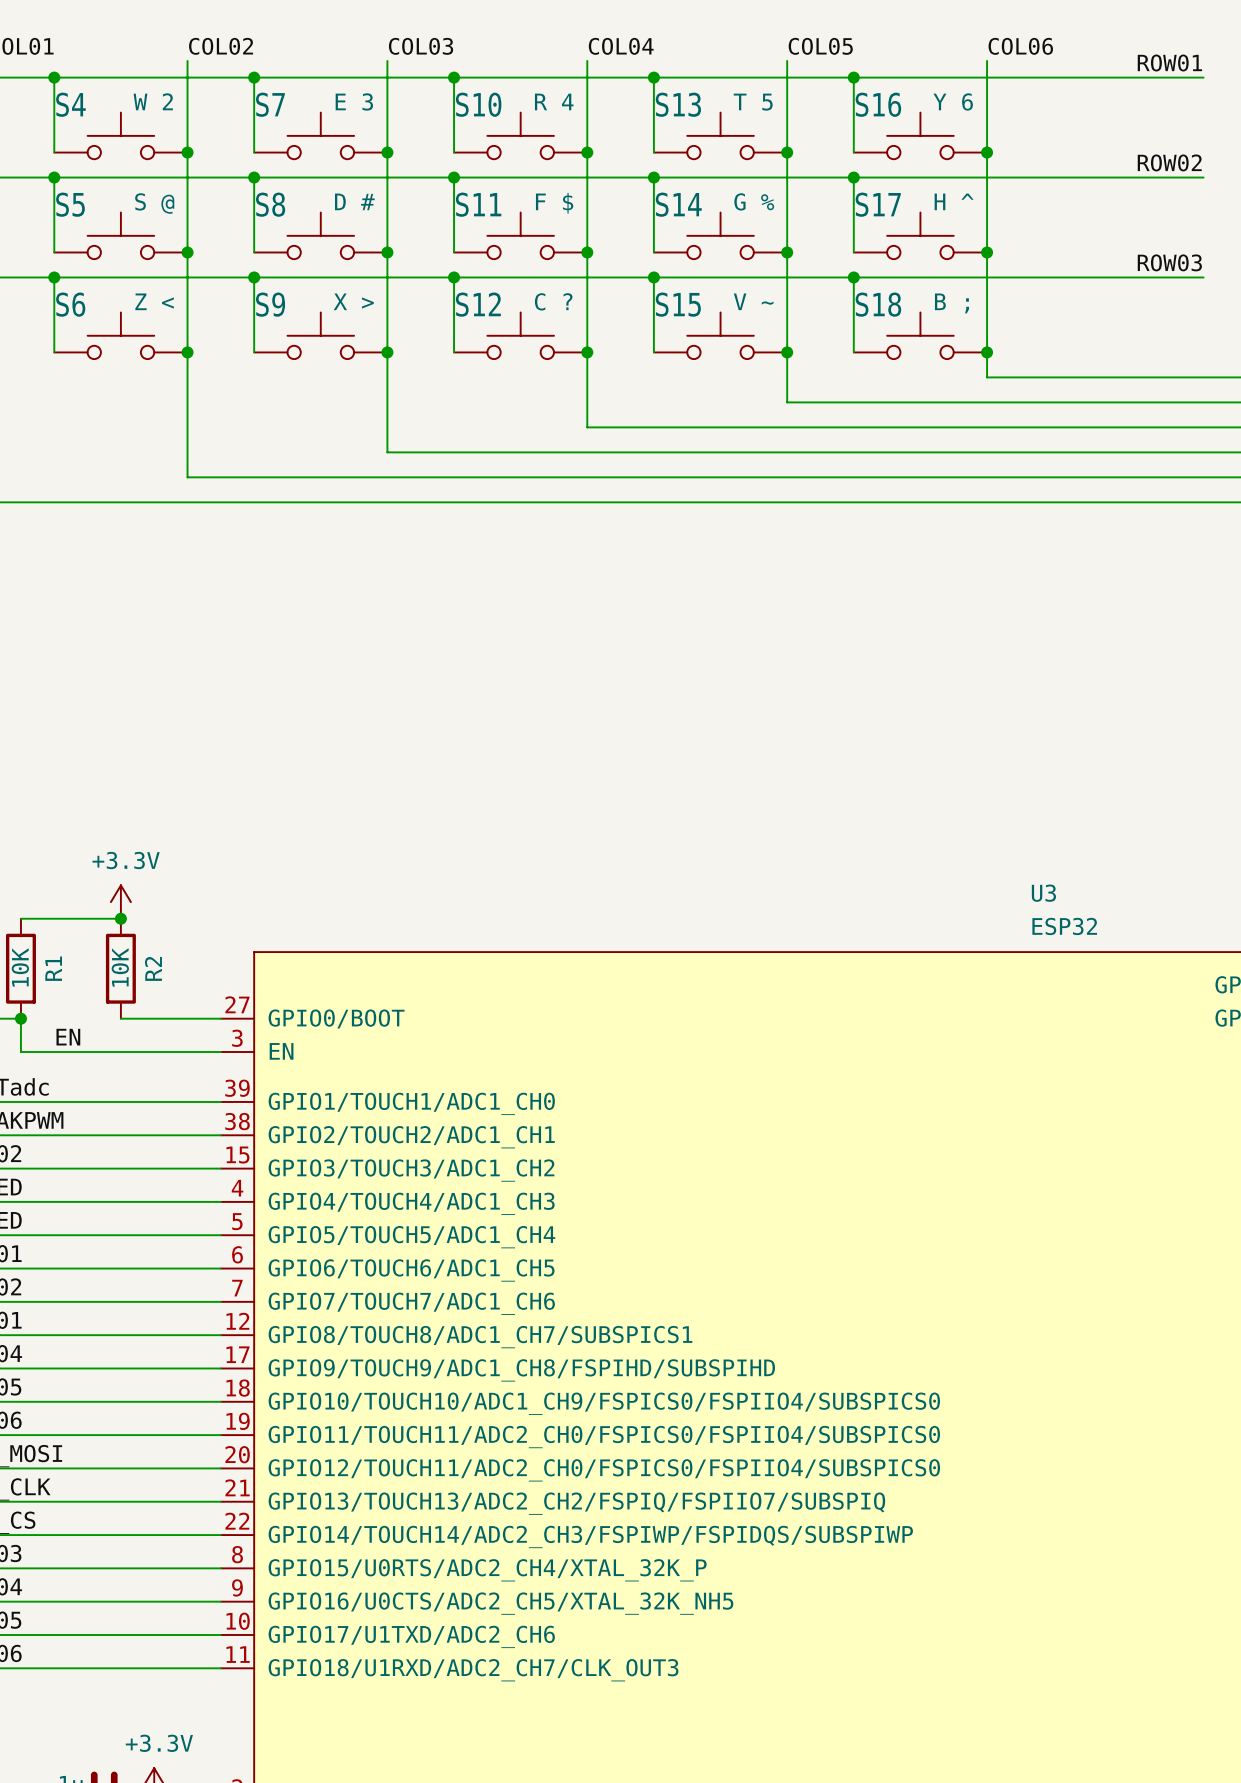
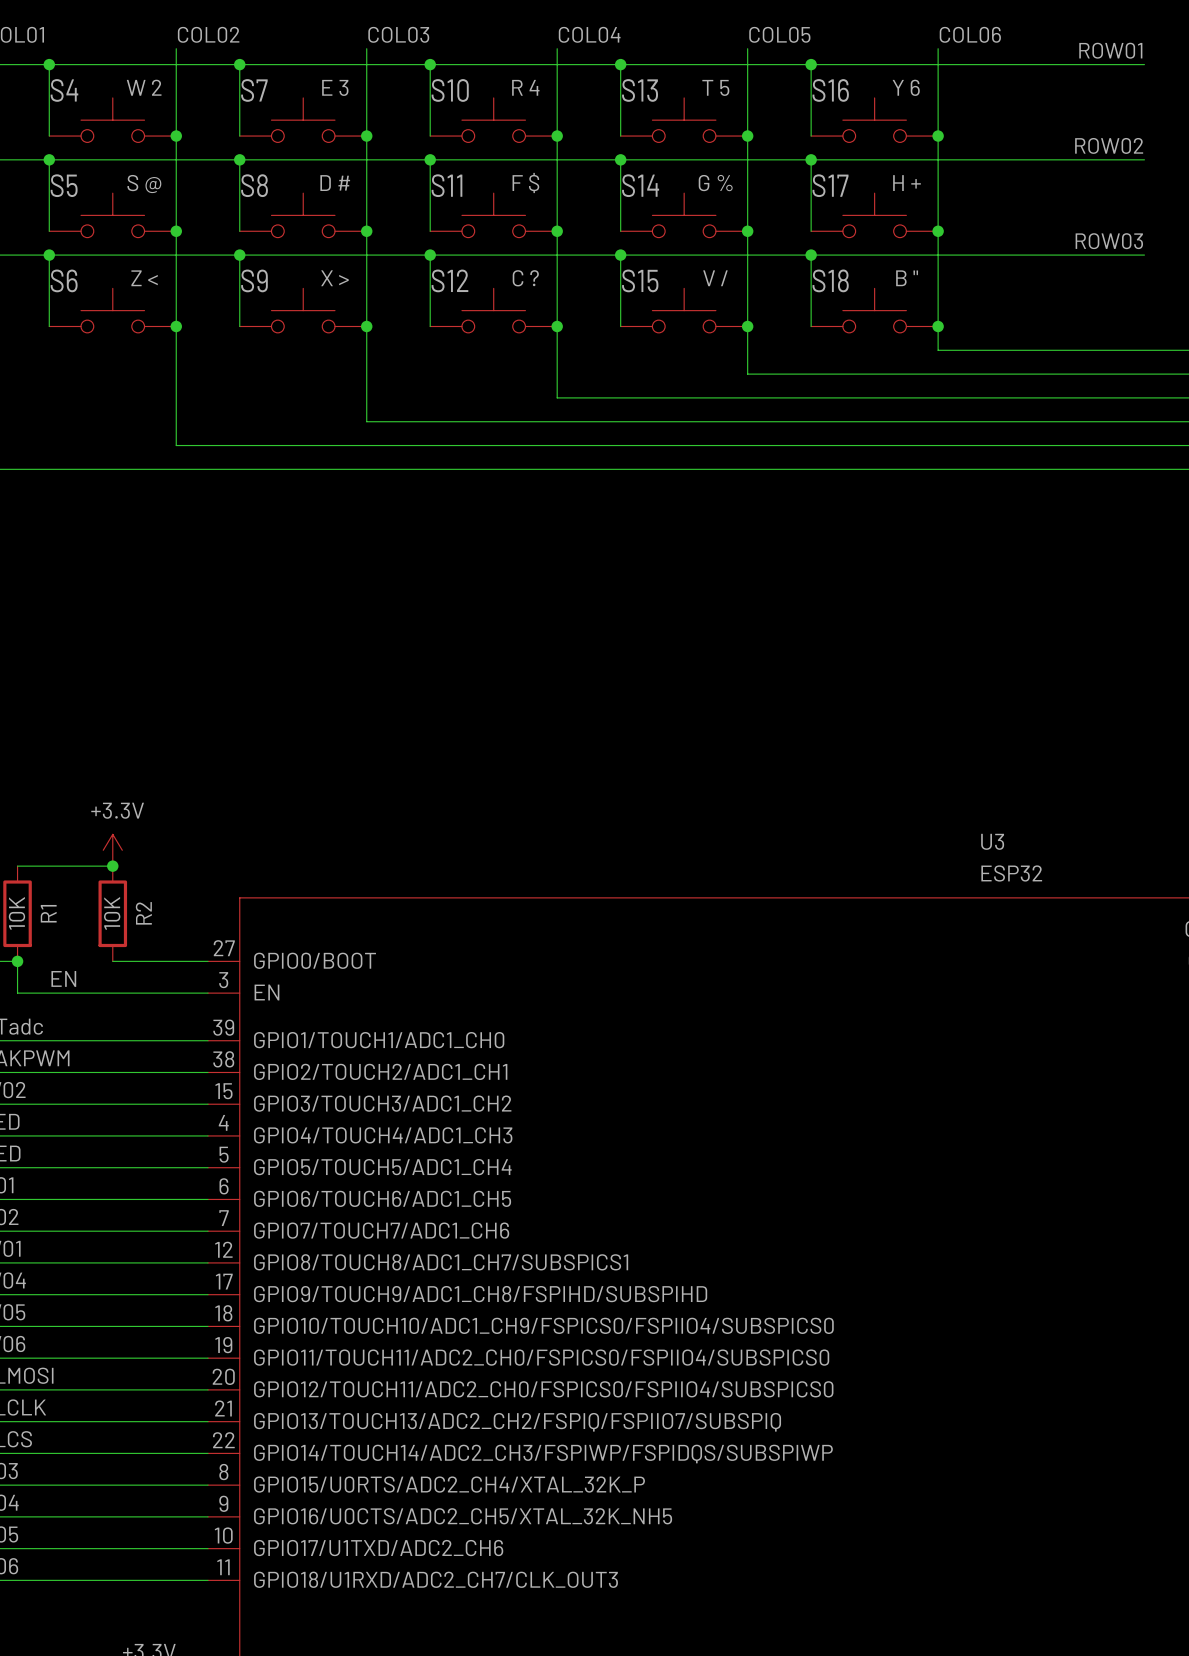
S17 text: H ^ (954, 201) -> H + (906, 183)
S15 text: V ~ (753, 301) -> V / (715, 278)
S18 text: B ; (951, 303) -> B " (907, 278)

